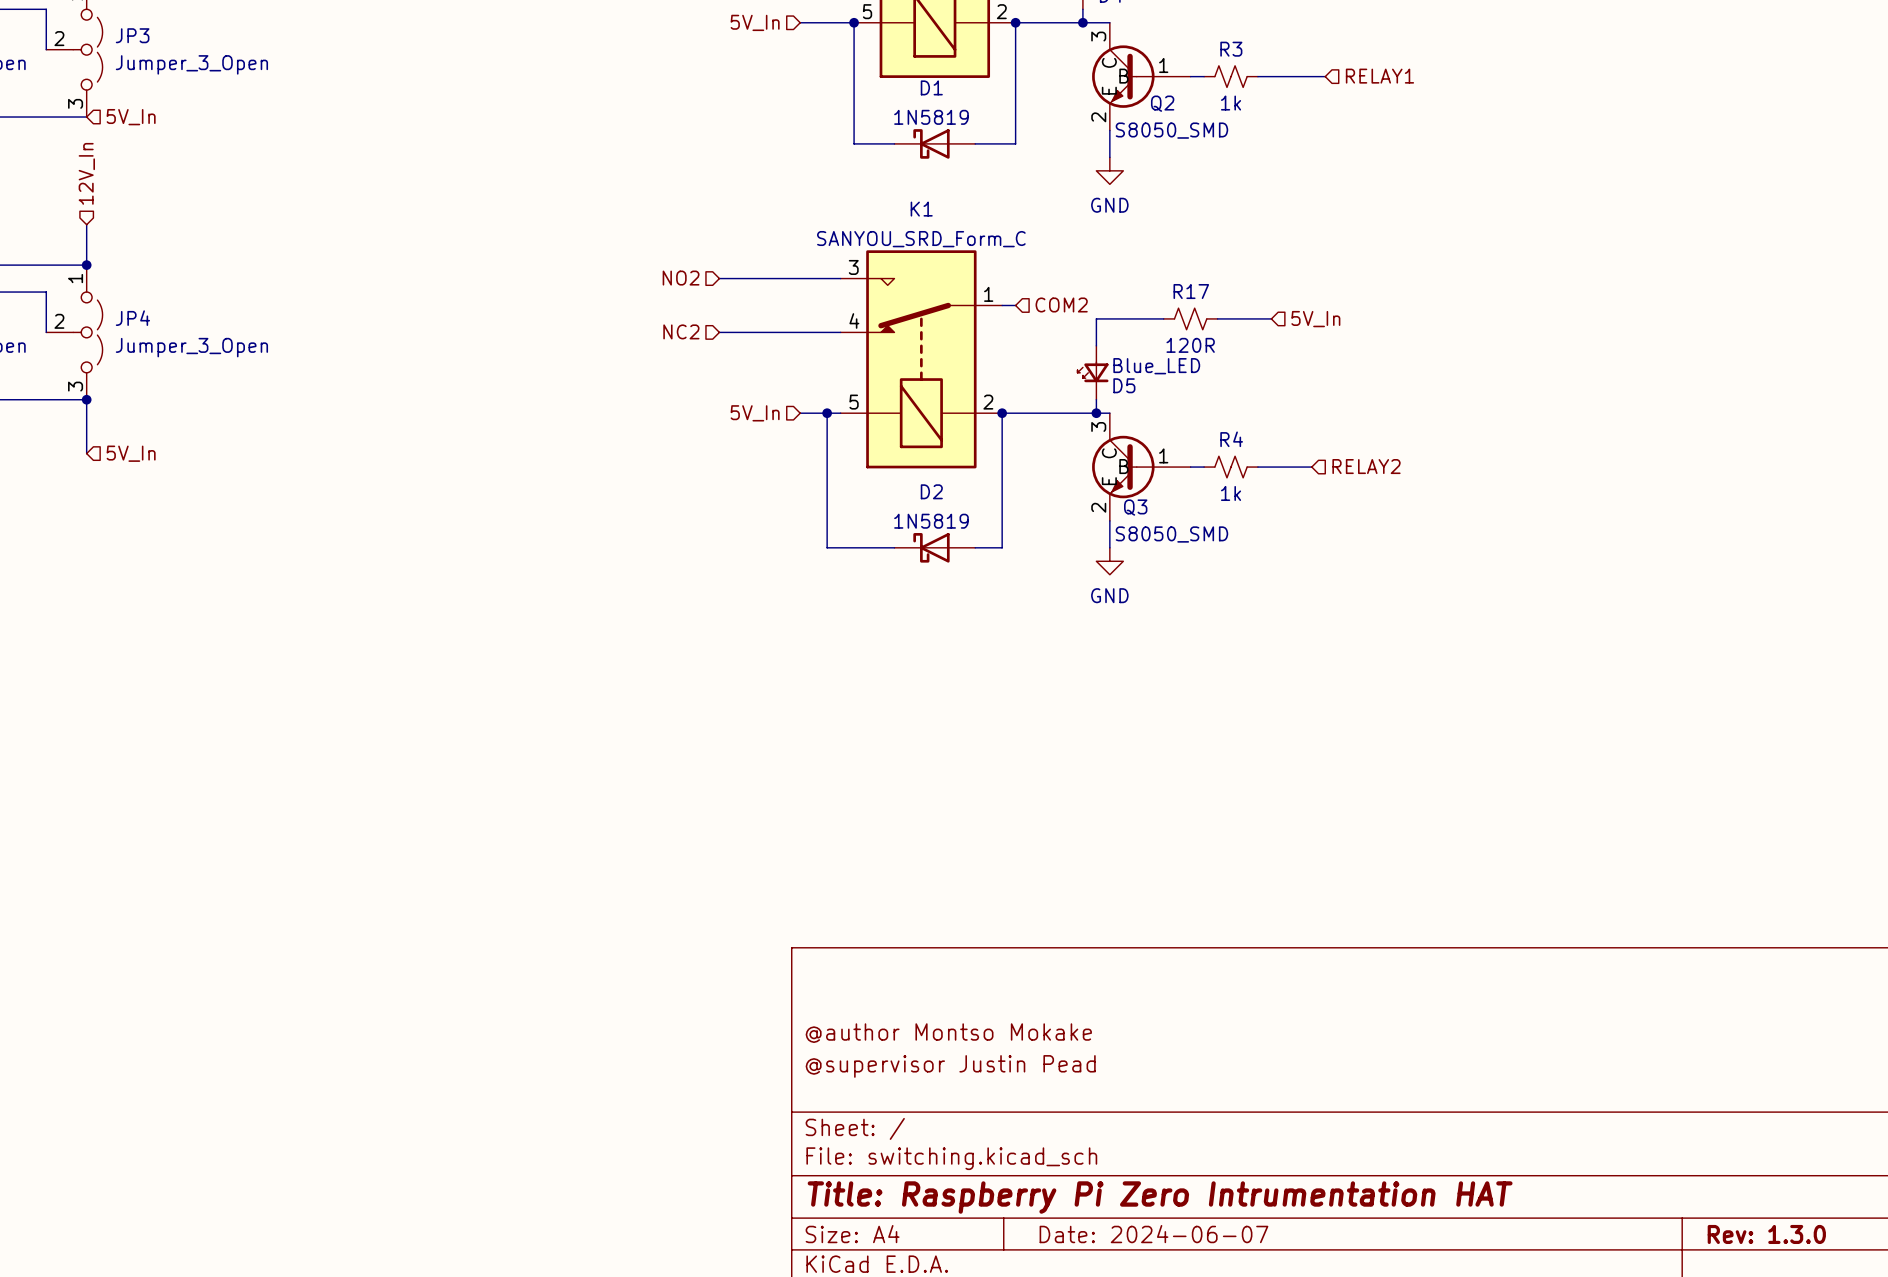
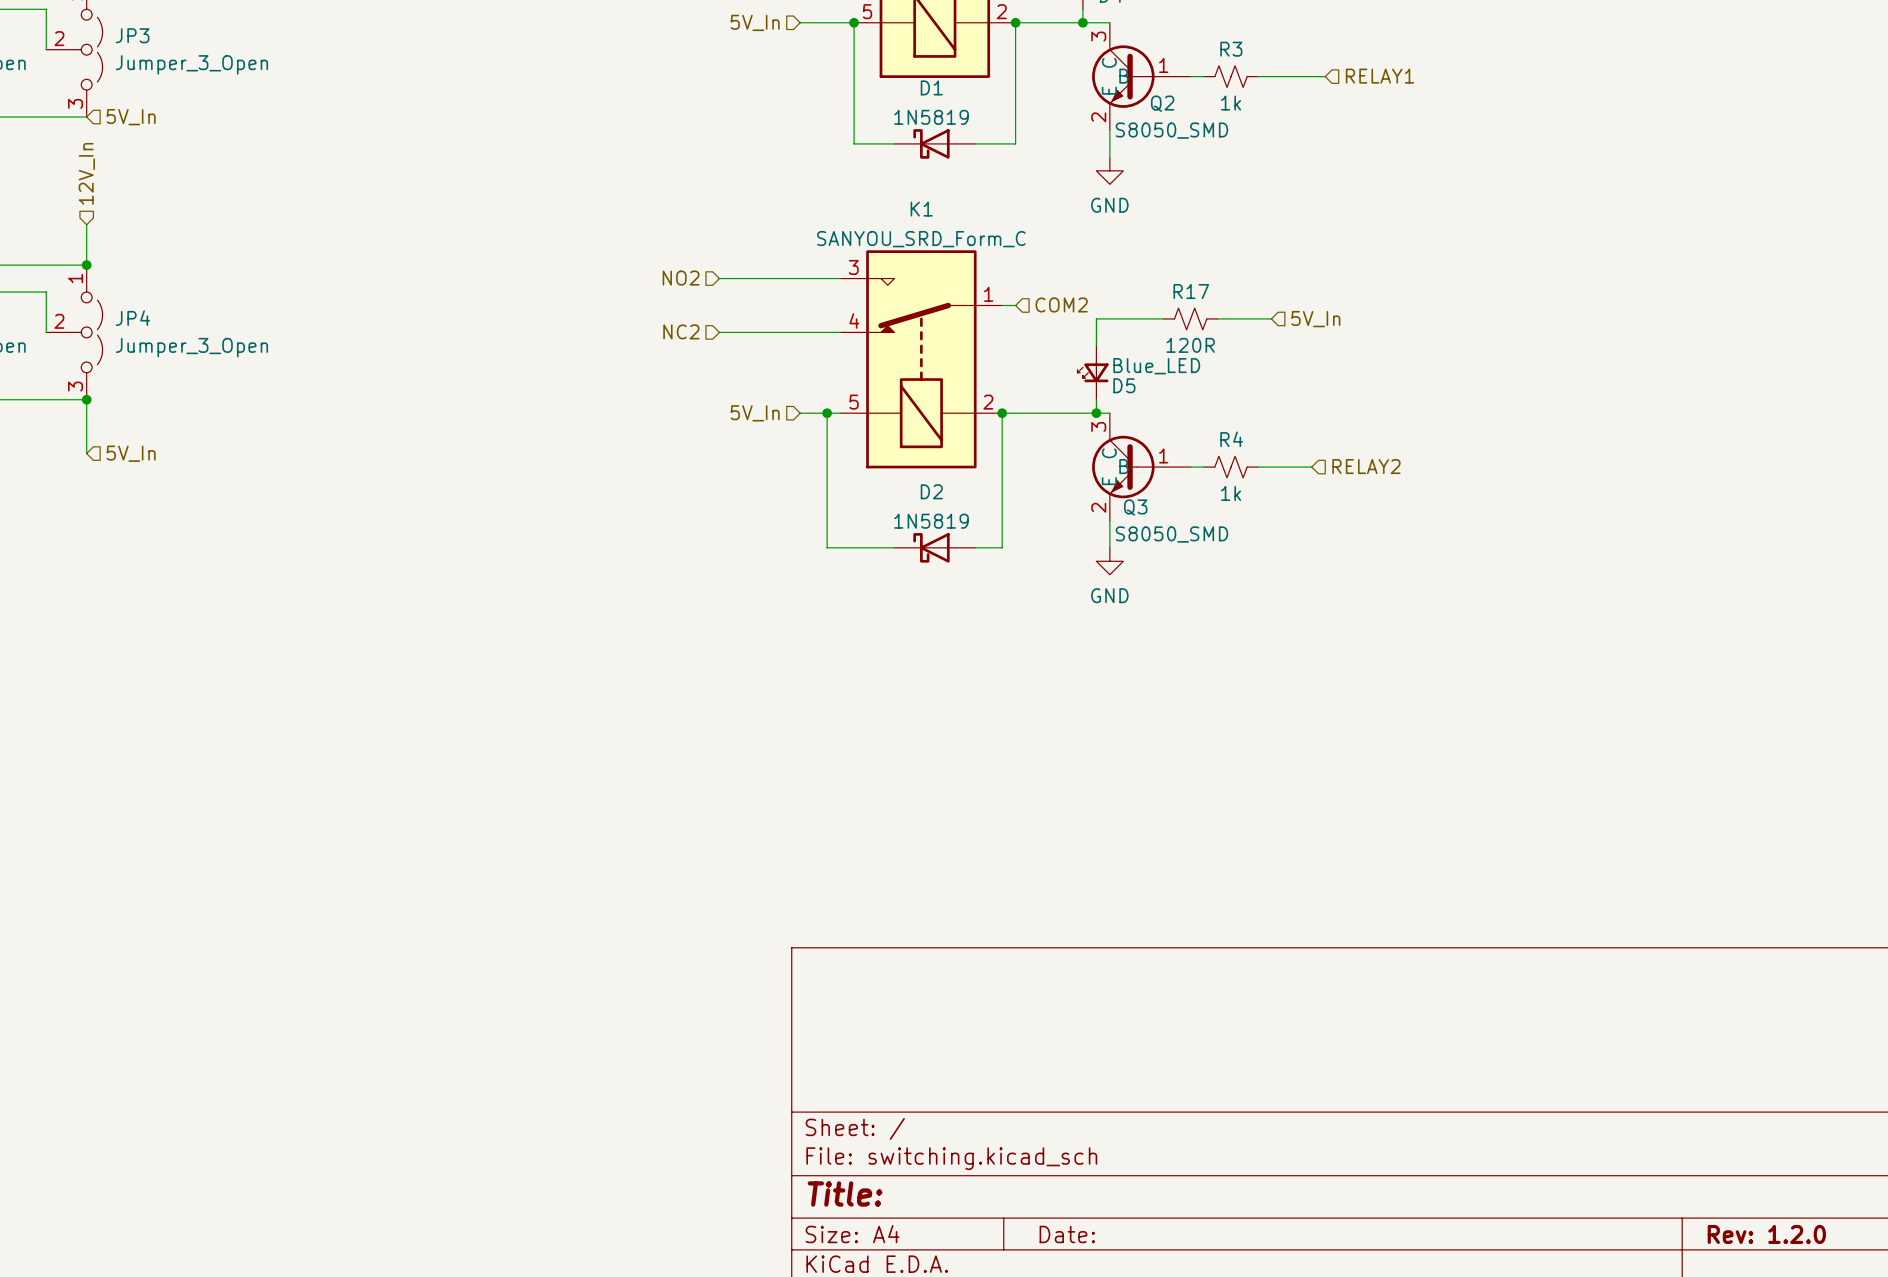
title block: @author Montso Mokake (948, 1033) -> none
title block: @supervisor Justin Pead (950, 1066) -> none
title block: Title: Raspberry Pi Zero Intrumentation HAT (1160, 1197) -> Title: (845, 1193)
title block: Date: 2024-06-07 (1153, 1234) -> Date: (1067, 1234)
title block: Rev: 1.3.0 (1766, 1234) -> Rev: 1.2.0 (1766, 1234)

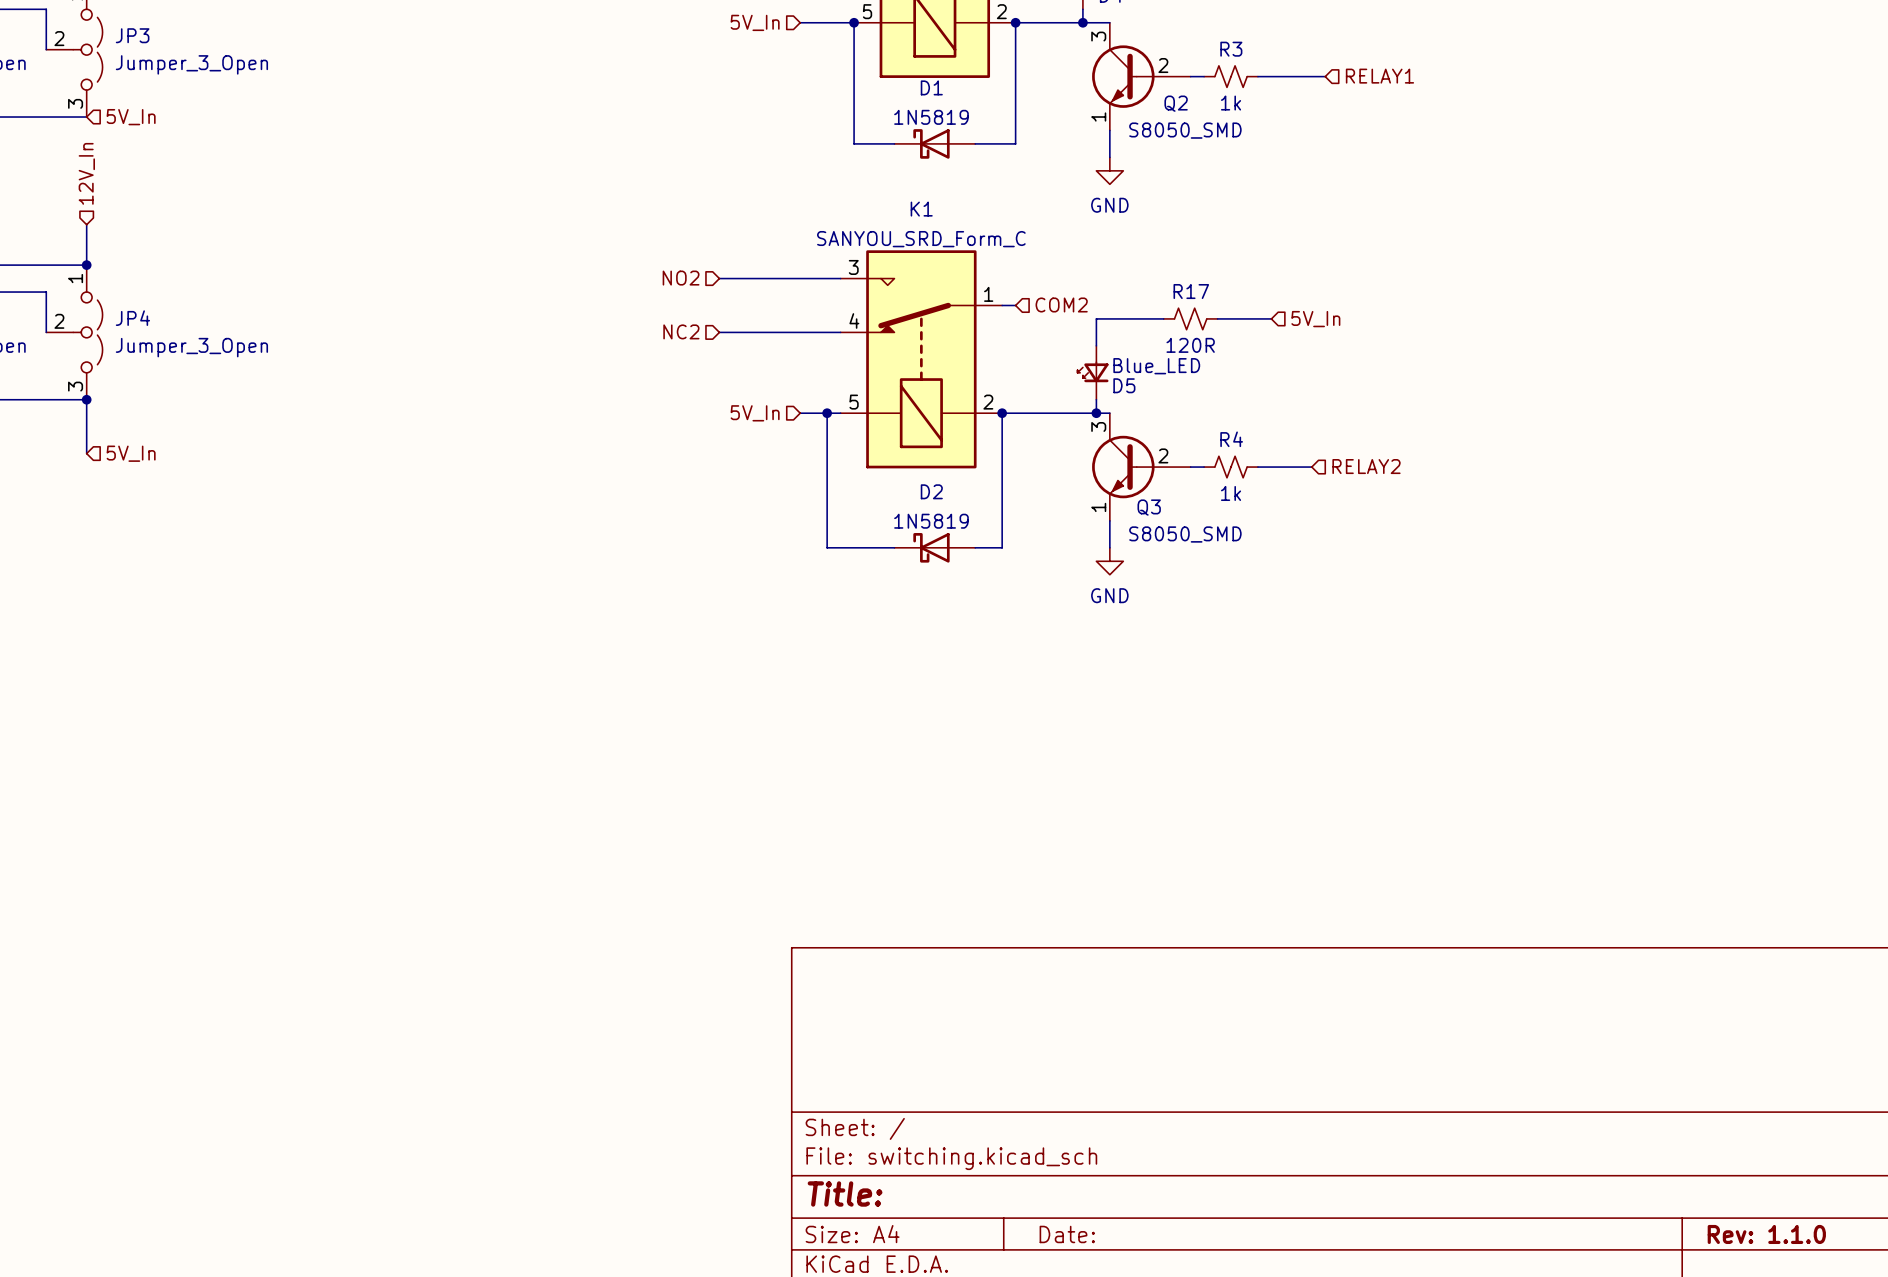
Q2 symbol: [1092, 22, 1191, 131] -> [1092, 22, 1191, 131]
Q3 symbol: [1092, 413, 1191, 521] -> [1092, 413, 1191, 521]
title block: Rev: 1.2.0 (1766, 1234) -> Rev: 1.1.0 (1766, 1234)

